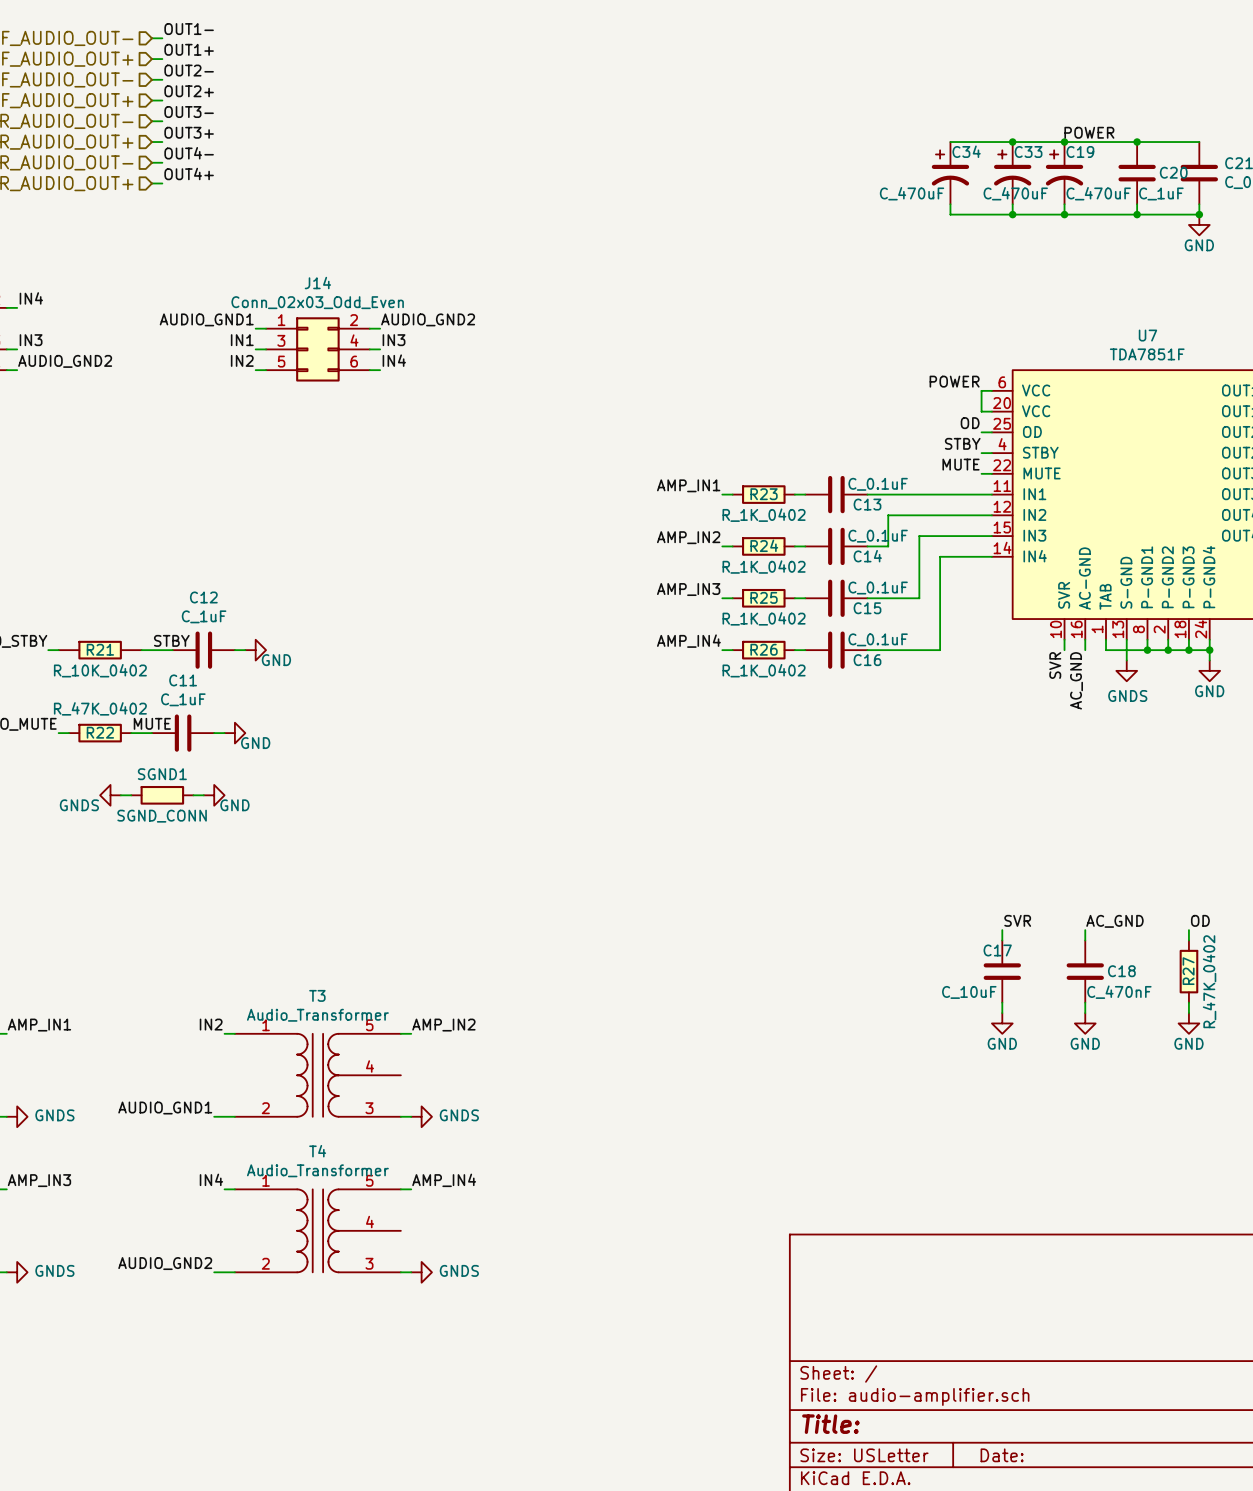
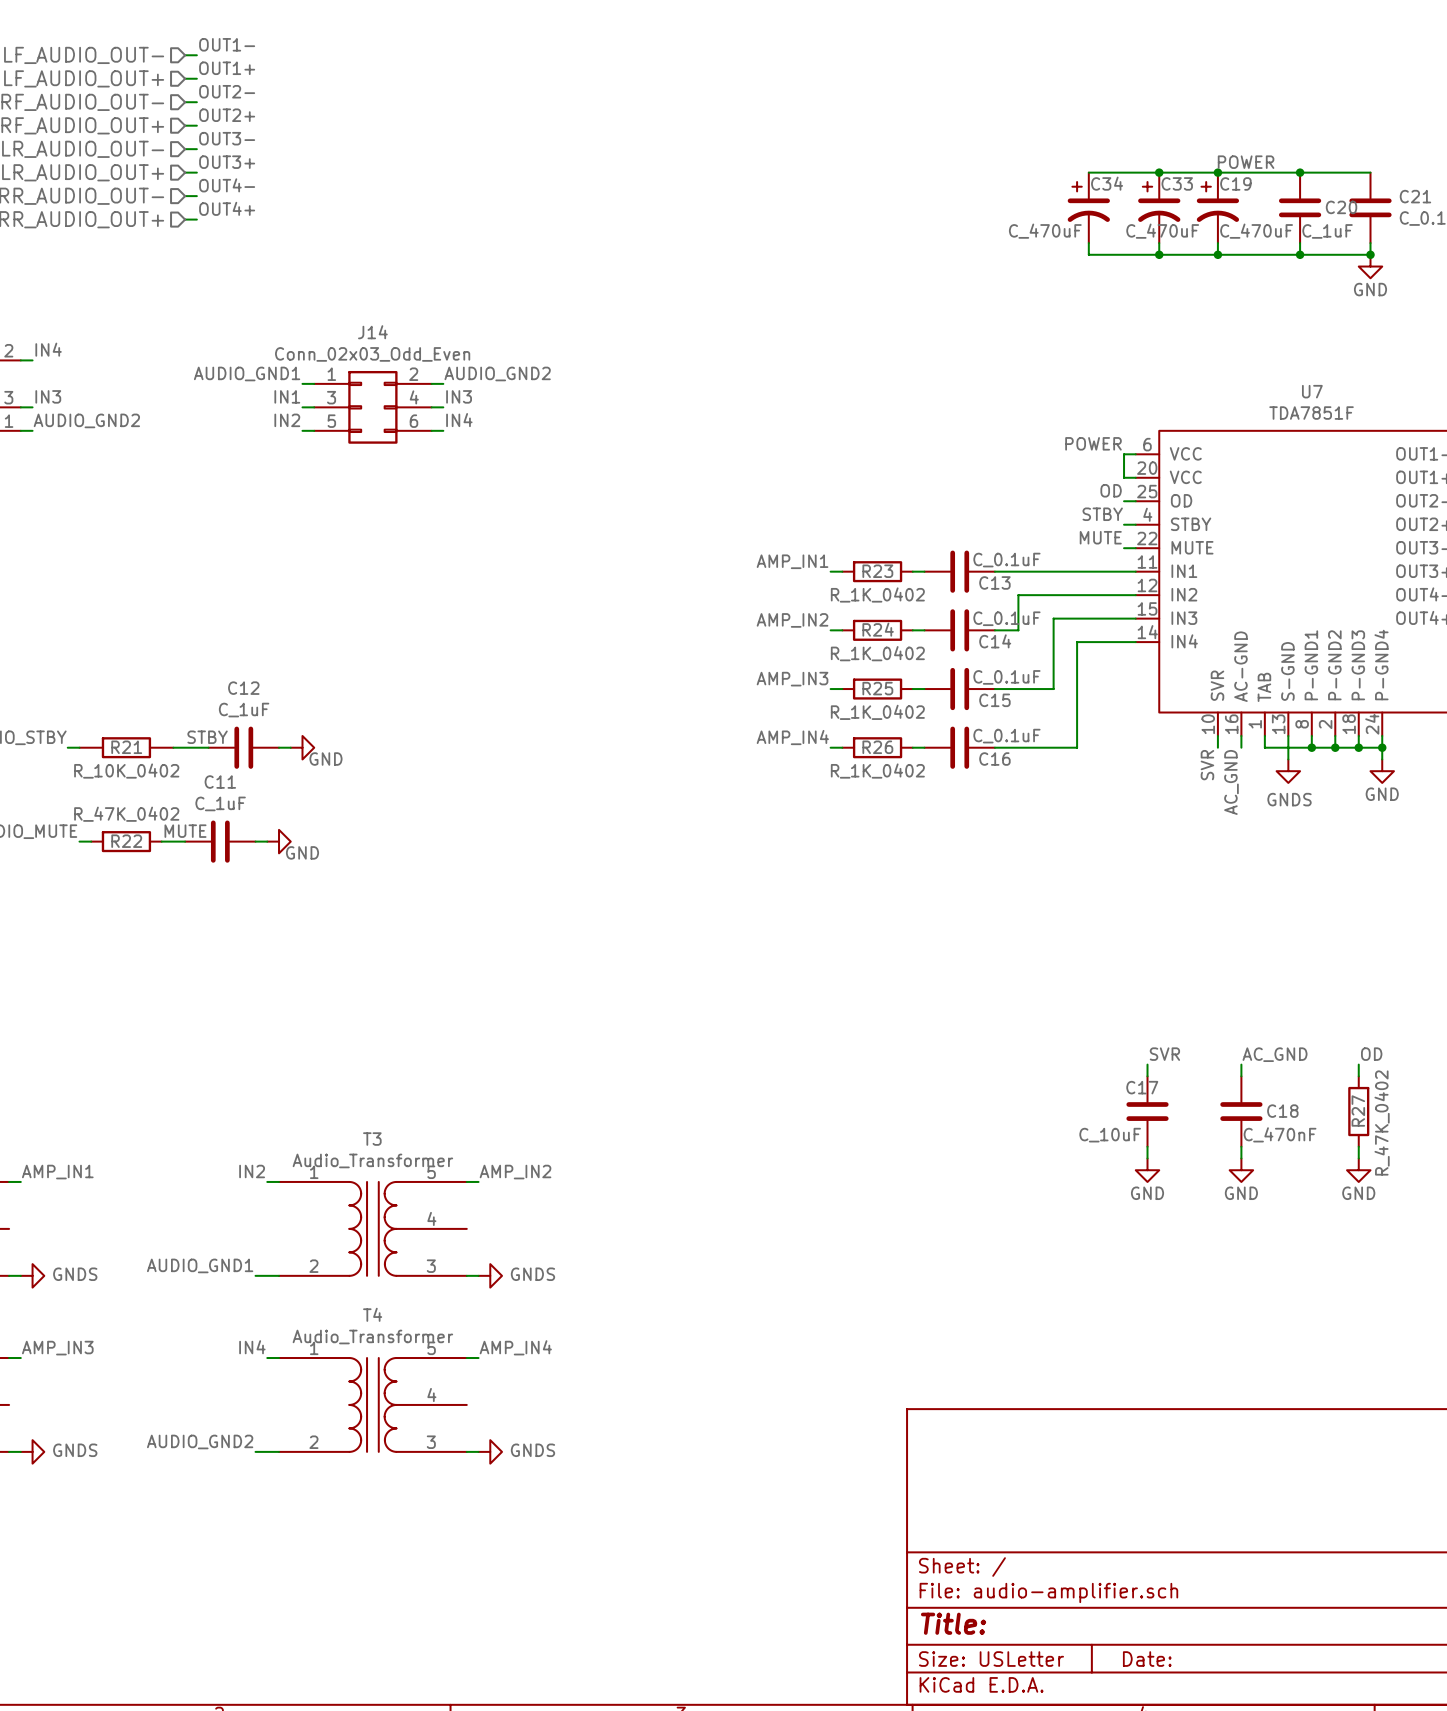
power symbol: GNDS (110, 795) -> none
wire: (120, 795) (131, 795) -> none
SGND1: SGND_CONN (162, 795) -> none
wire: (193, 795) (203, 795) -> none
power symbol: GND (214, 795) -> none

